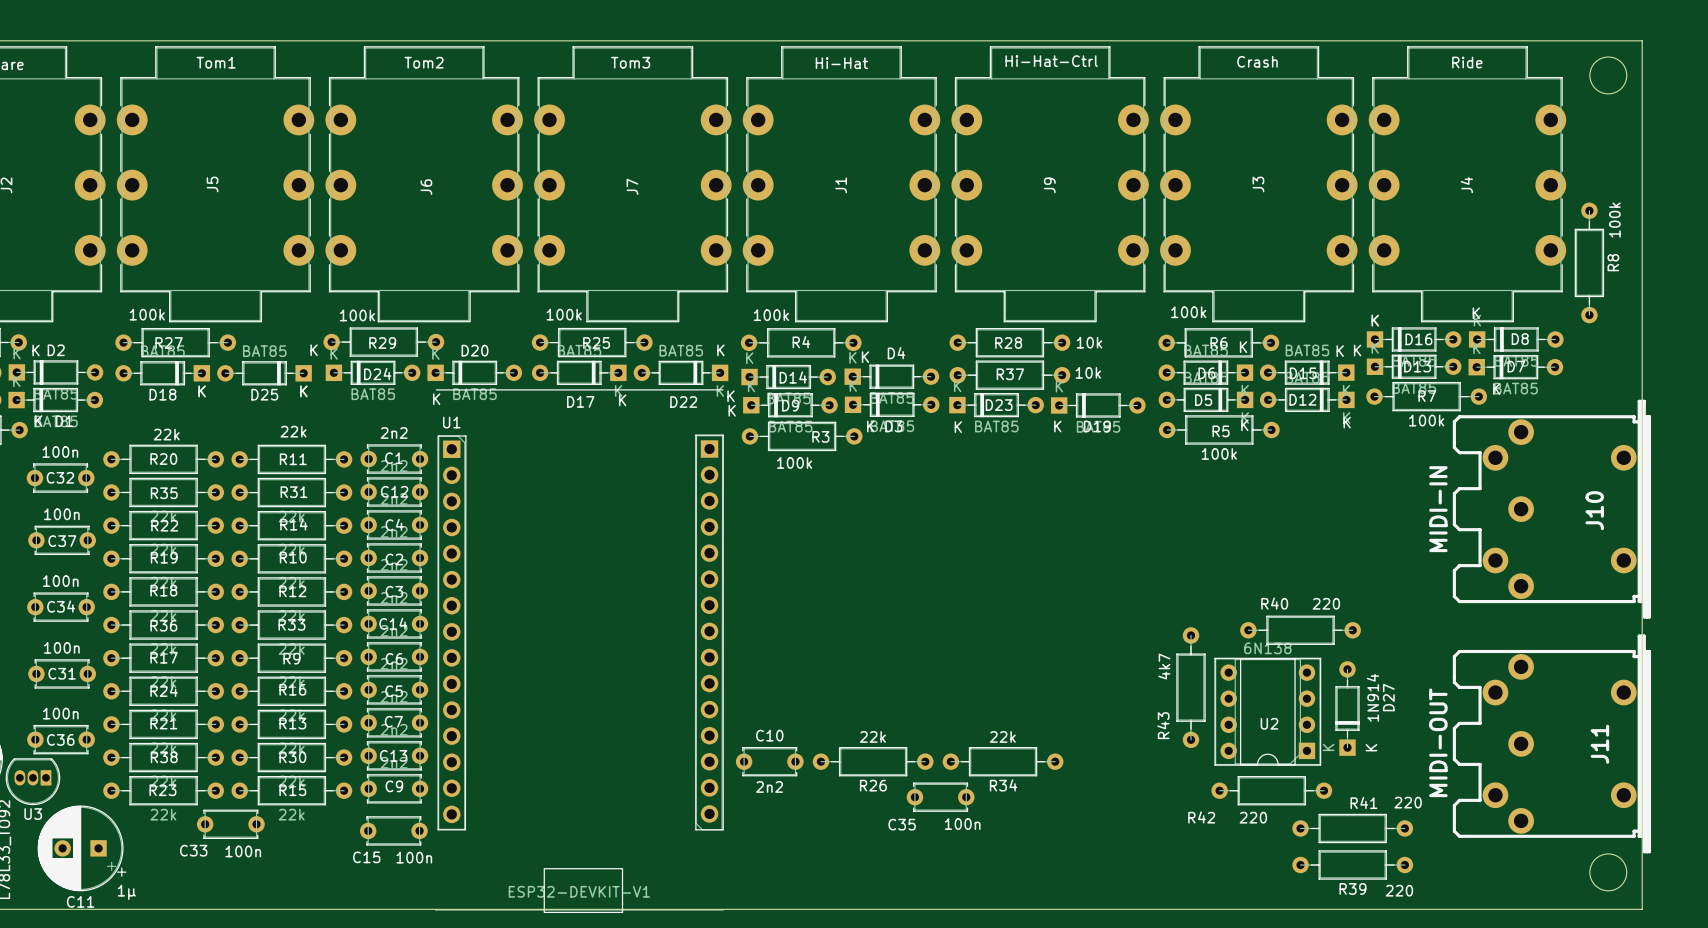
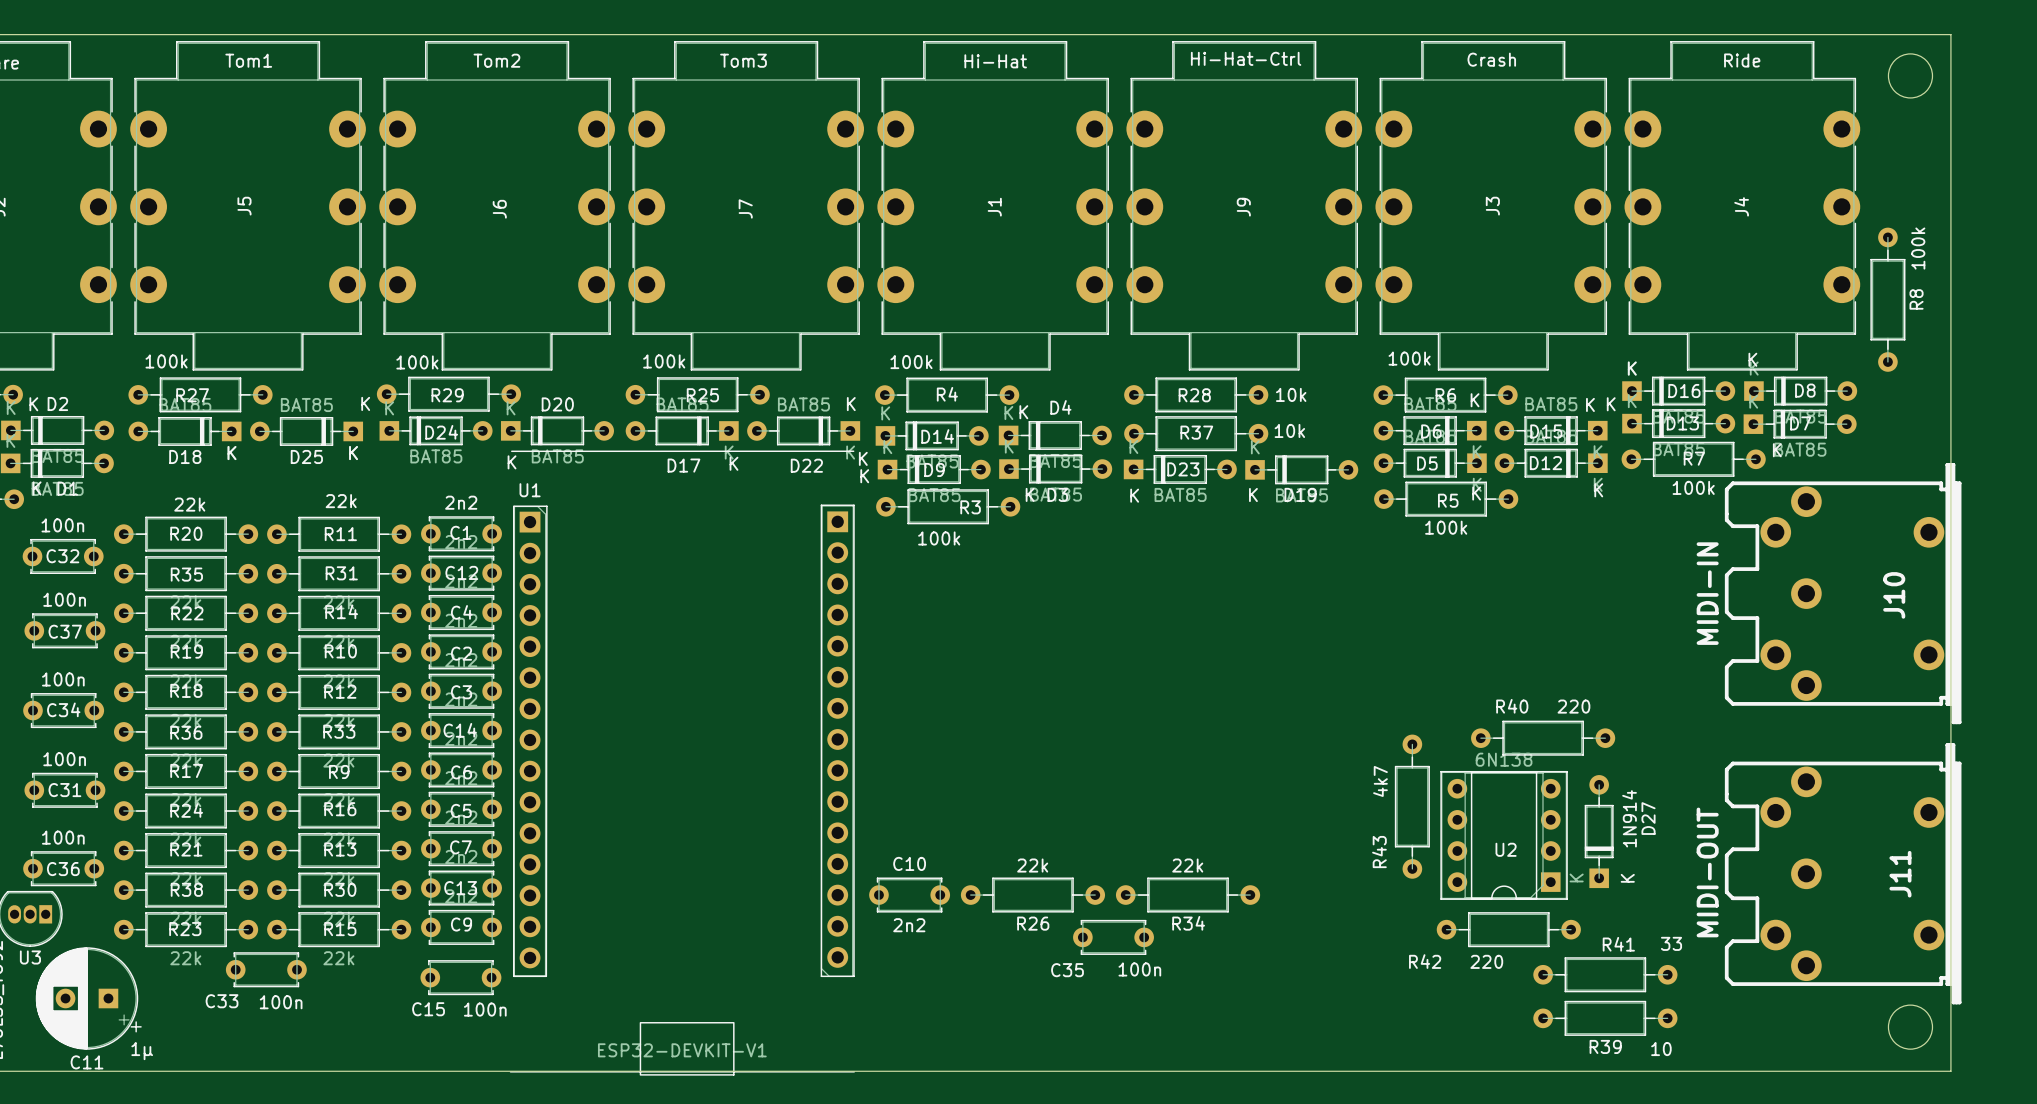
R41 value: 220 (1408, 802) -> 33 (1671, 943)
R39 value: 220 (1399, 890) -> 10 (1661, 1049)

